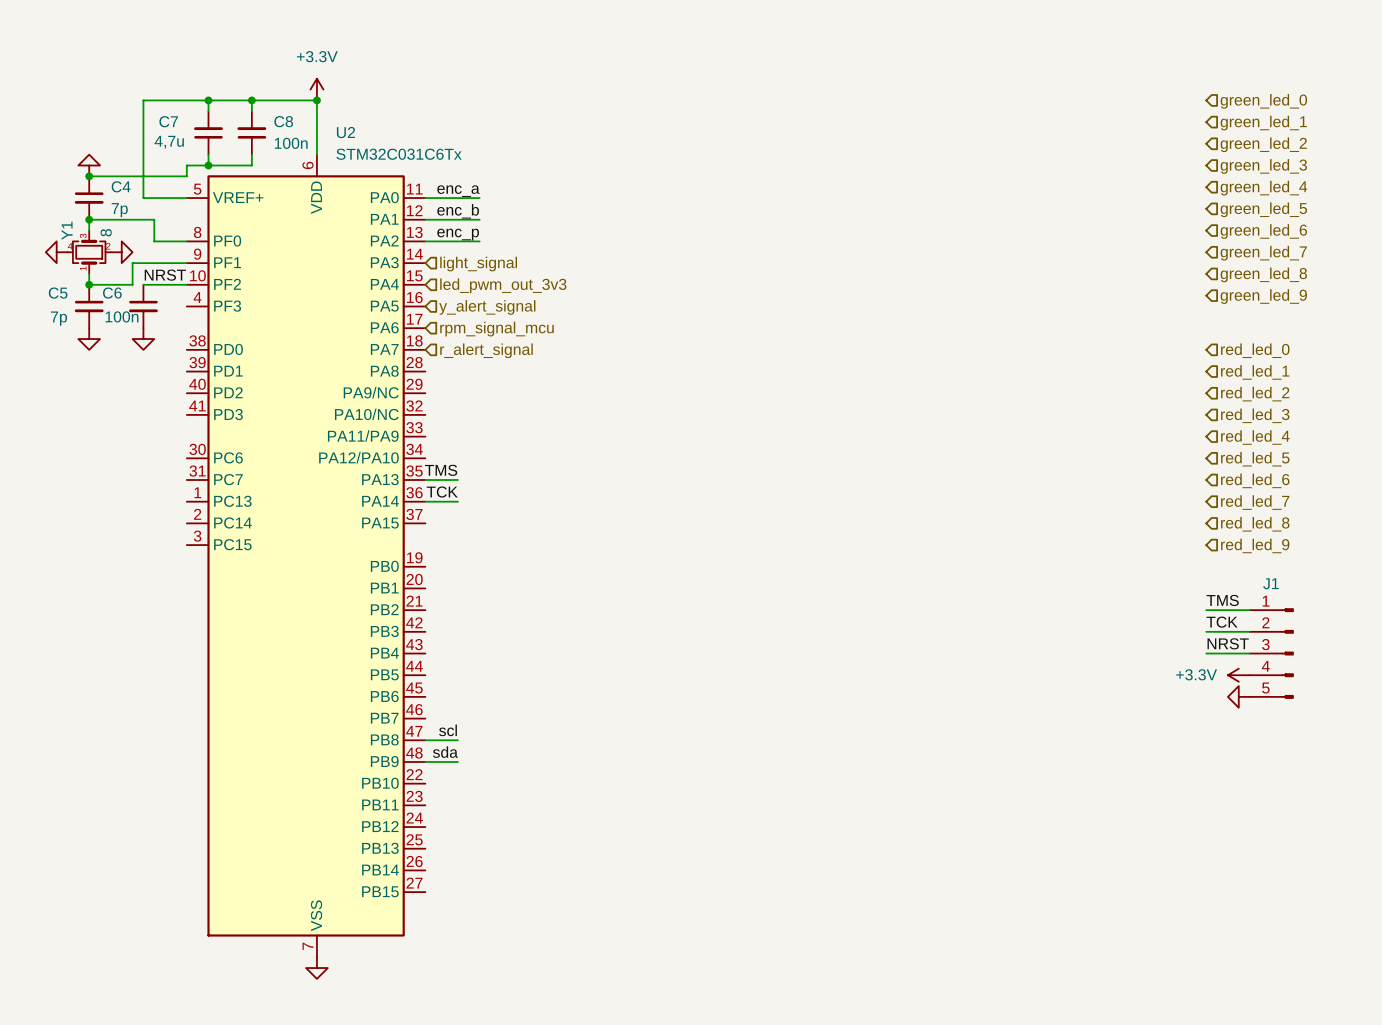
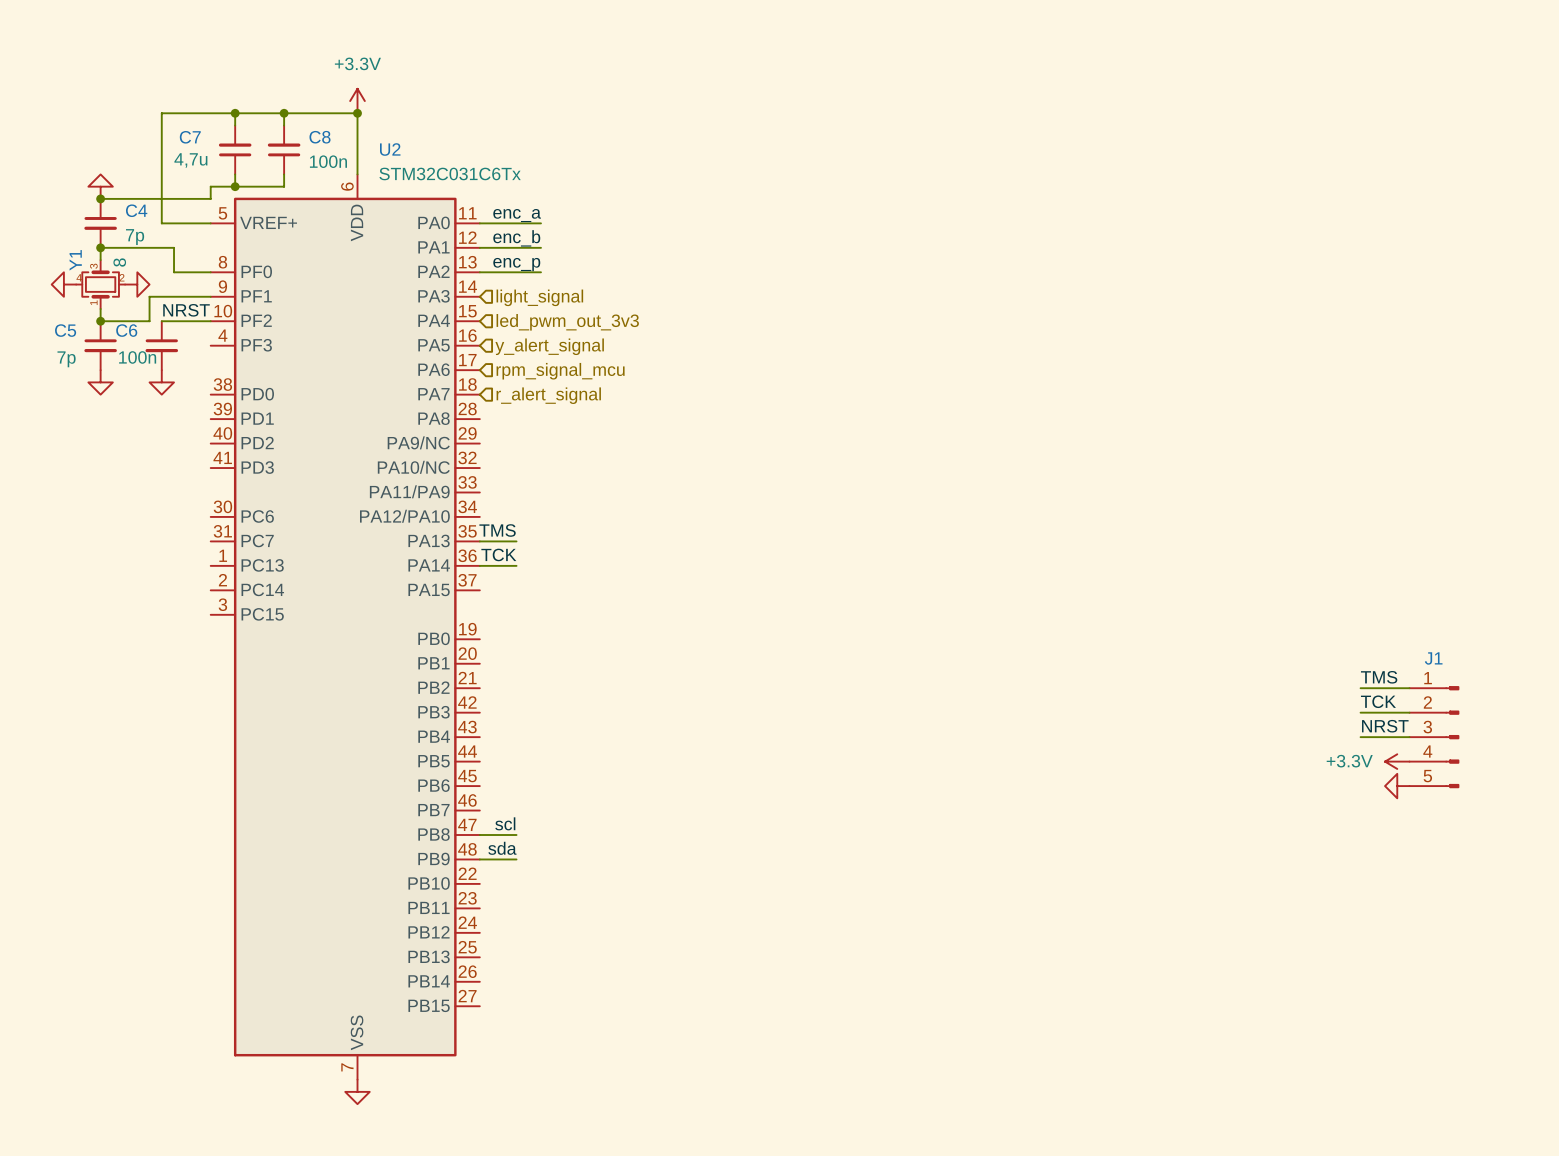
hierarchical label: green_led_0 (1263, 101) -> none
hierarchical label: green_led_1 (1263, 123) -> none
hierarchical label: green_led_2 (1263, 144) -> none
hierarchical label: green_led_3 (1263, 166) -> none
hierarchical label: green_led_4 (1263, 188) -> none
hierarchical label: green_led_5 (1263, 209) -> none
hierarchical label: green_led_6 (1263, 231) -> none
hierarchical label: green_led_7 (1263, 253) -> none
hierarchical label: green_led_8 (1263, 274) -> none
hierarchical label: green_led_9 (1263, 296) -> none
hierarchical label: red_led_0 (1255, 350) -> none
hierarchical label: red_led_1 (1255, 372) -> none
hierarchical label: red_led_2 (1255, 394) -> none
hierarchical label: red_led_3 (1255, 415) -> none
hierarchical label: red_led_4 (1255, 437) -> none
hierarchical label: red_led_5 (1255, 459) -> none
hierarchical label: red_led_6 (1255, 480) -> none
hierarchical label: red_led_7 (1255, 502) -> none
hierarchical label: red_led_8 (1255, 524) -> none
hierarchical label: red_led_9 (1255, 545) -> none

